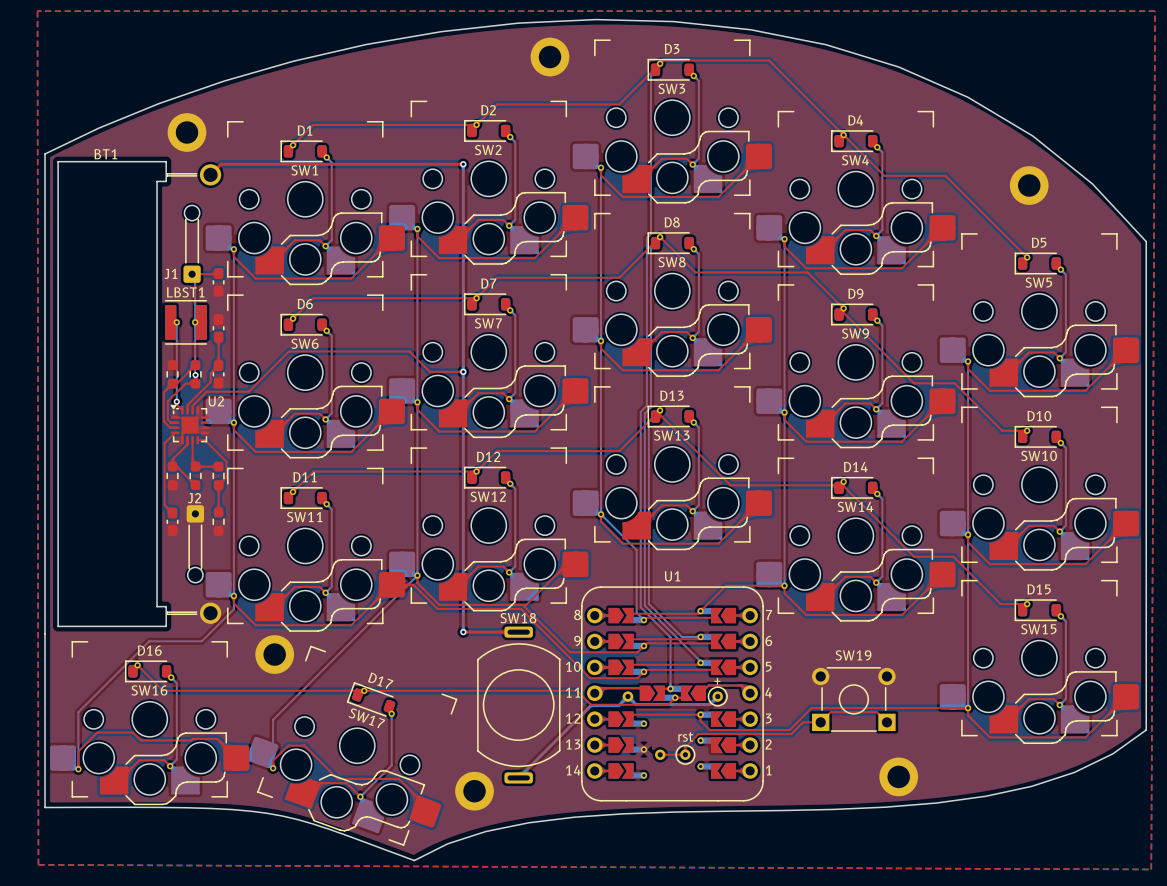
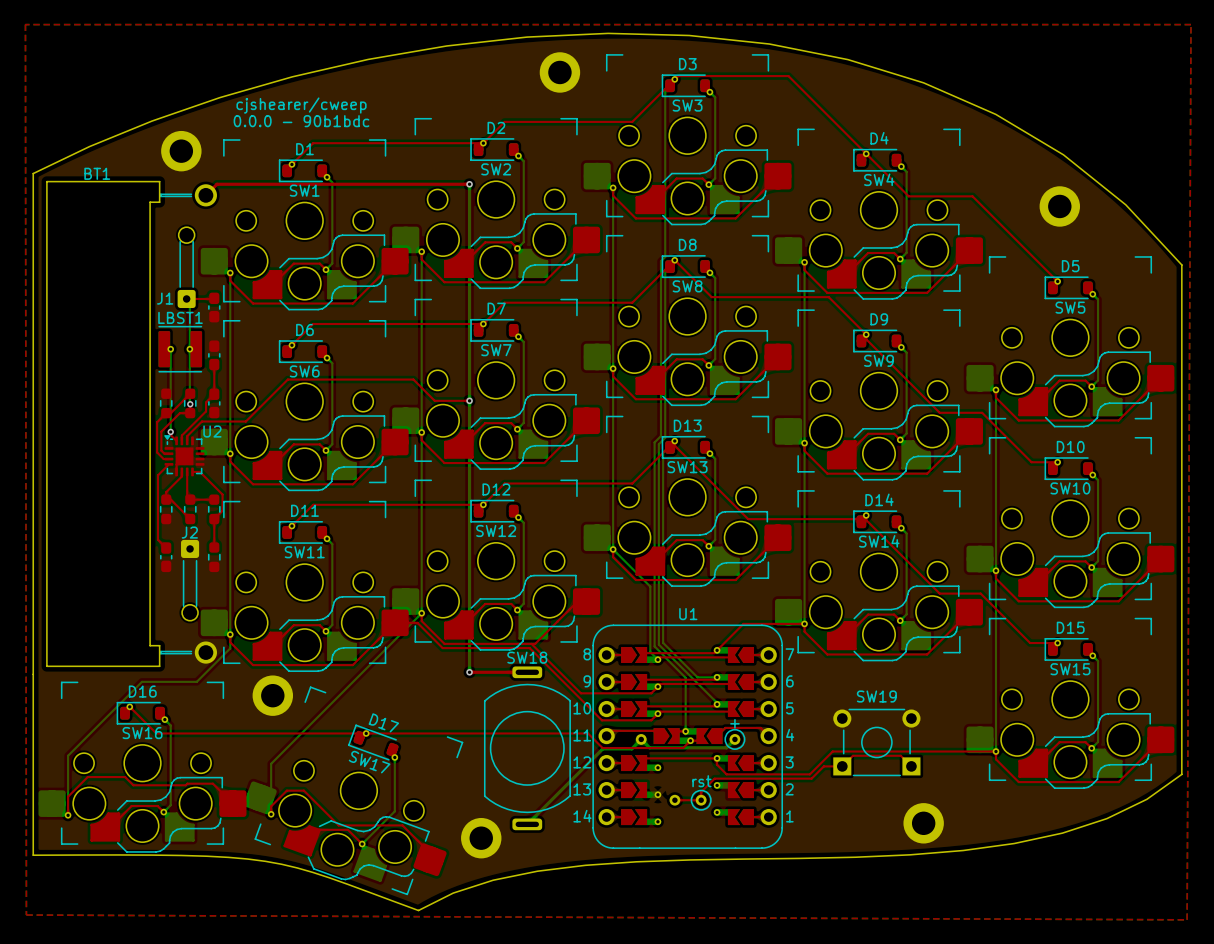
text: none -> cjshearer/cweep (301, 105)
text: none -> 0.0.0 - 90b1bdc (301, 121)

